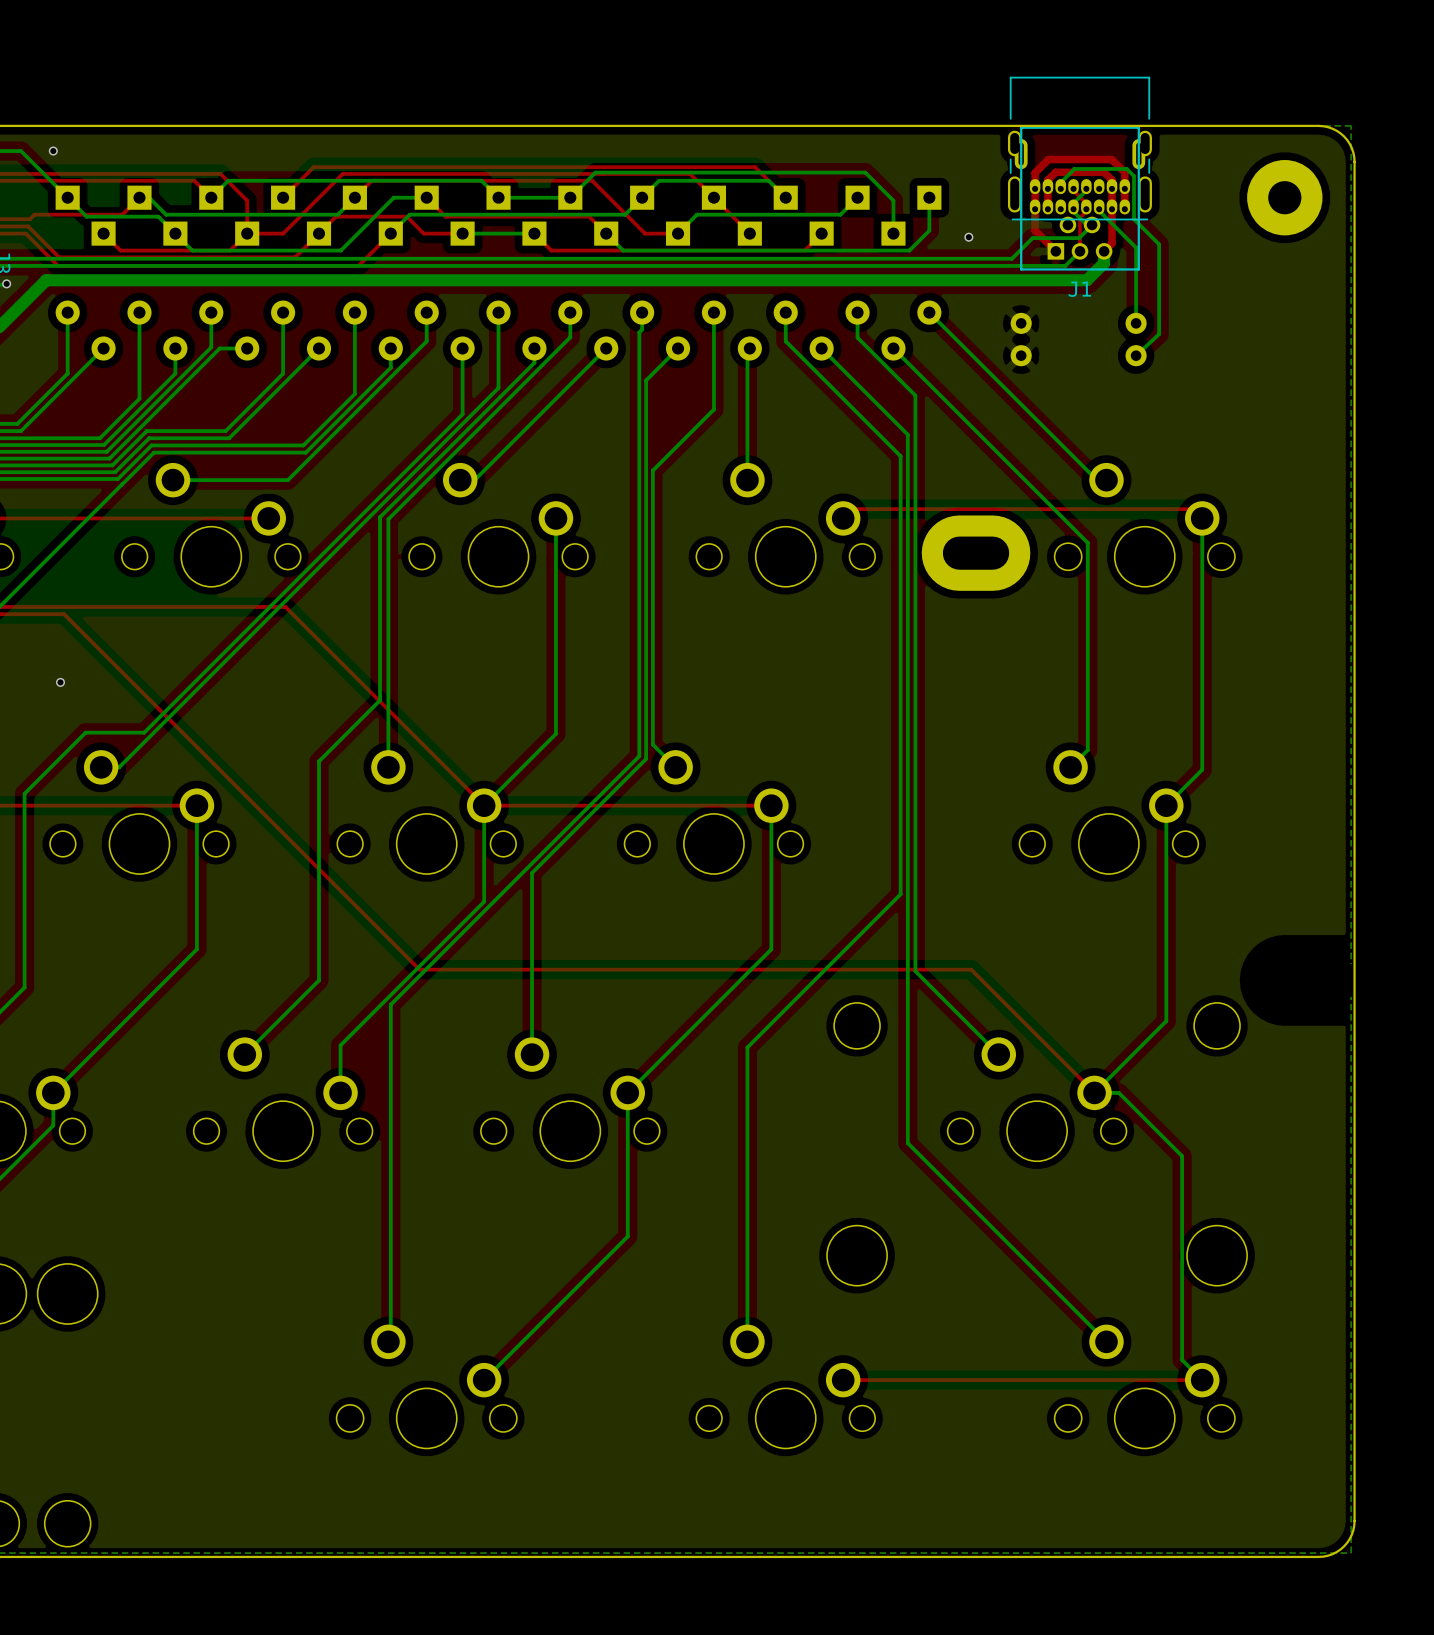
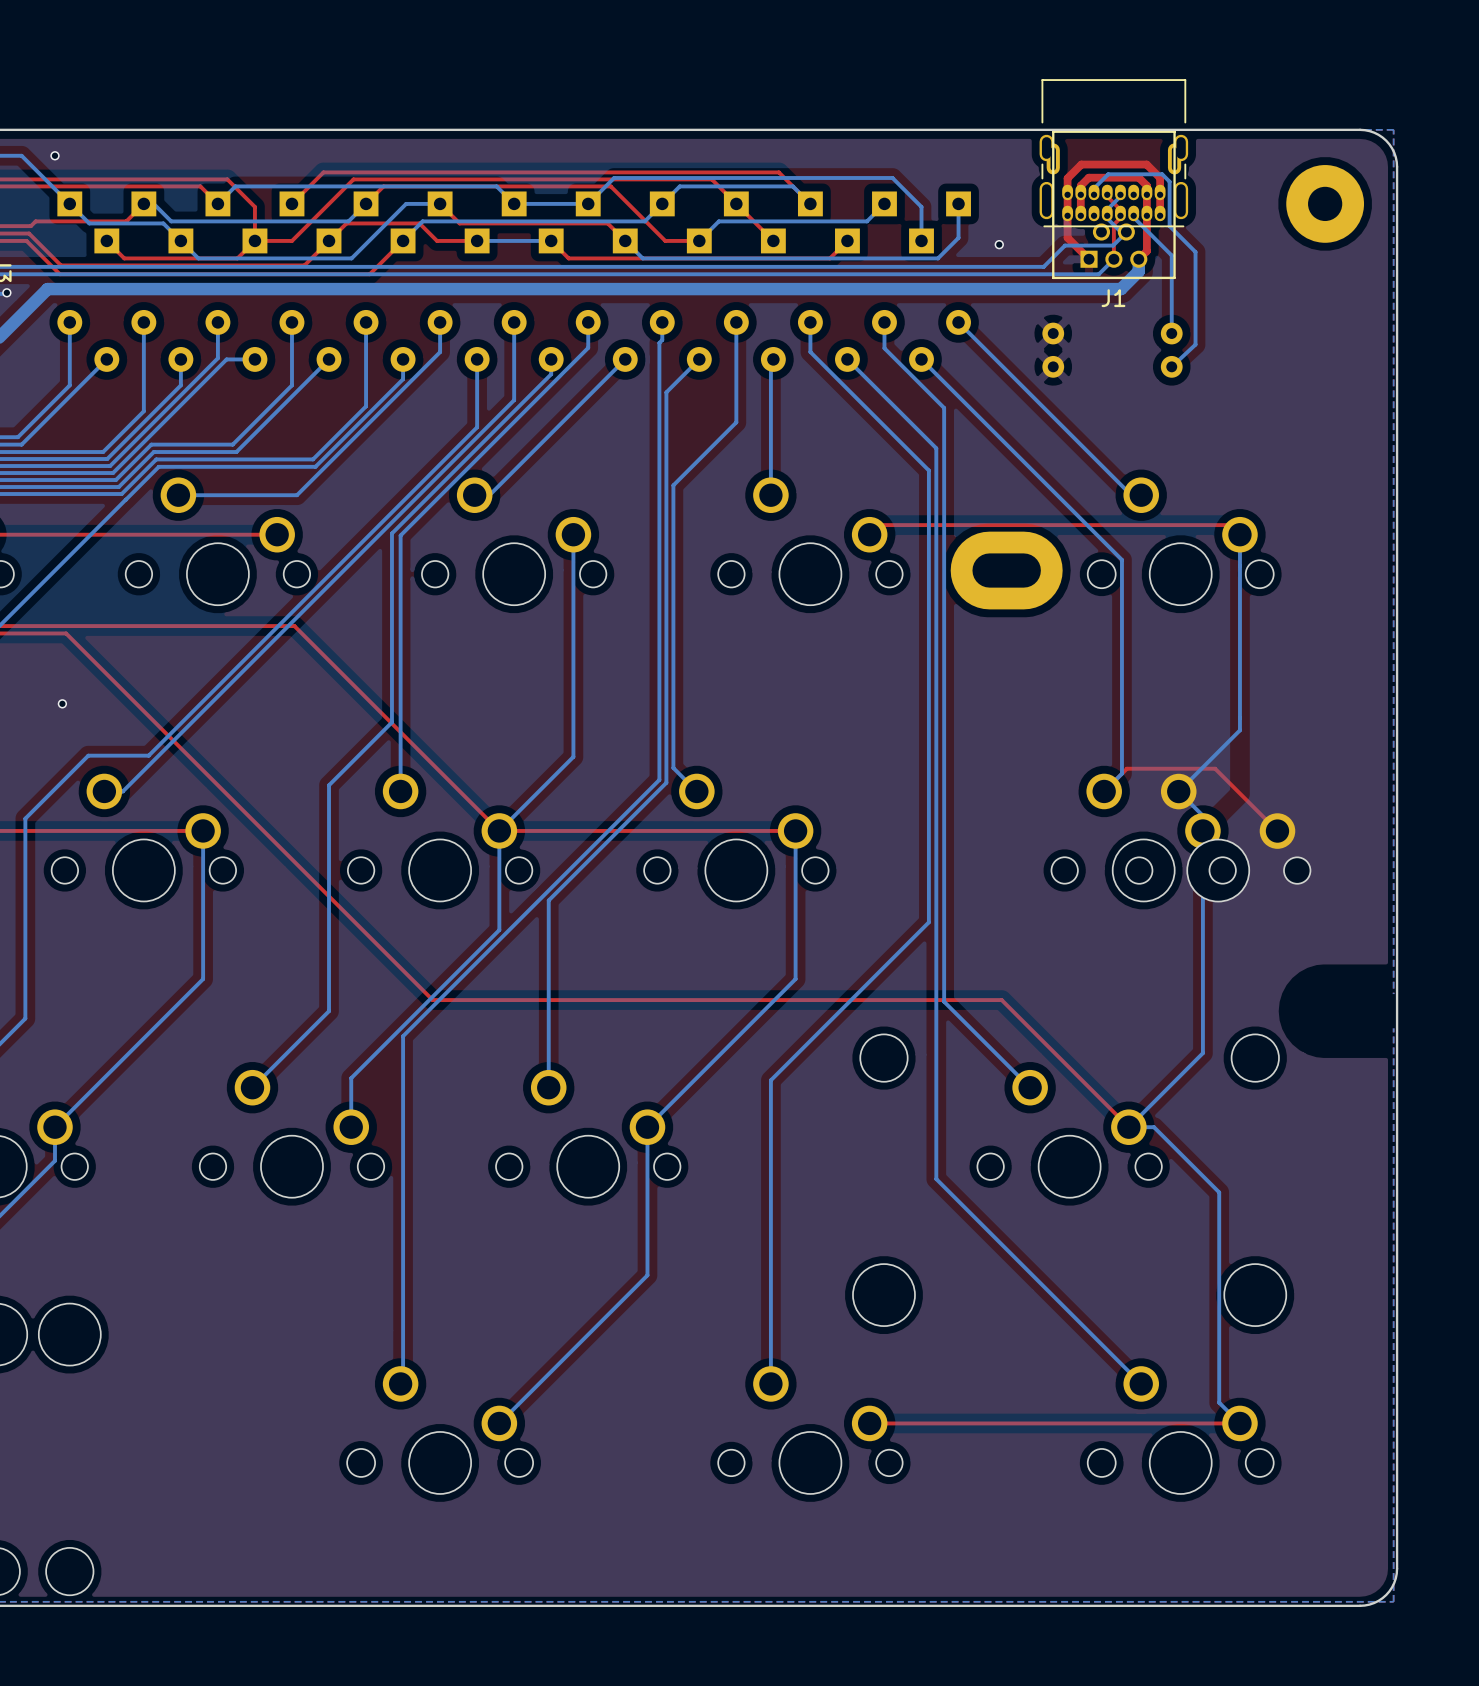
bottom track: (1202, 708) (1202, 769) (1166, 805) -> (1239, 730) (1178, 791) (1202, 815) (1202, 830)
top track: none -> (1104, 791) (1126, 768) (1215, 768) (1277, 831)
part: none -> (1218, 837)

